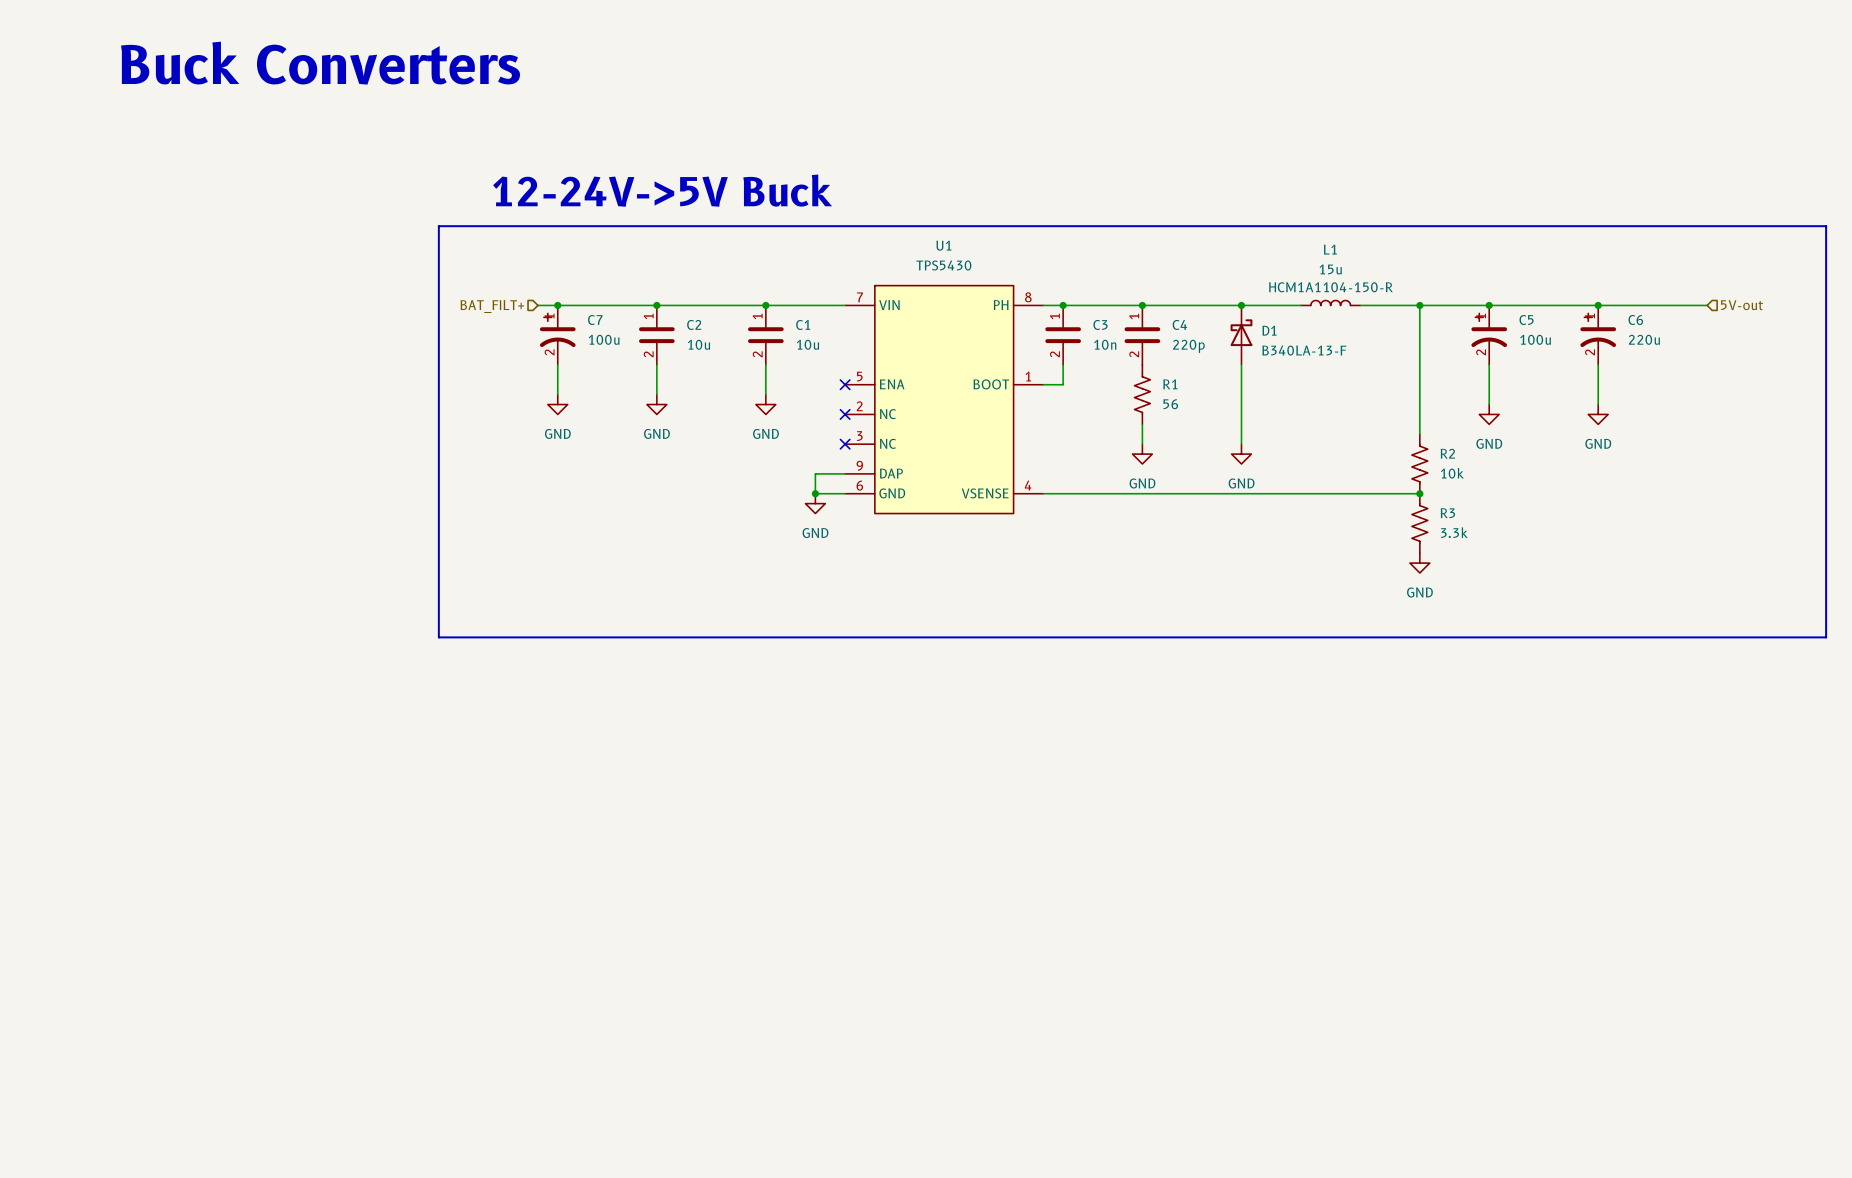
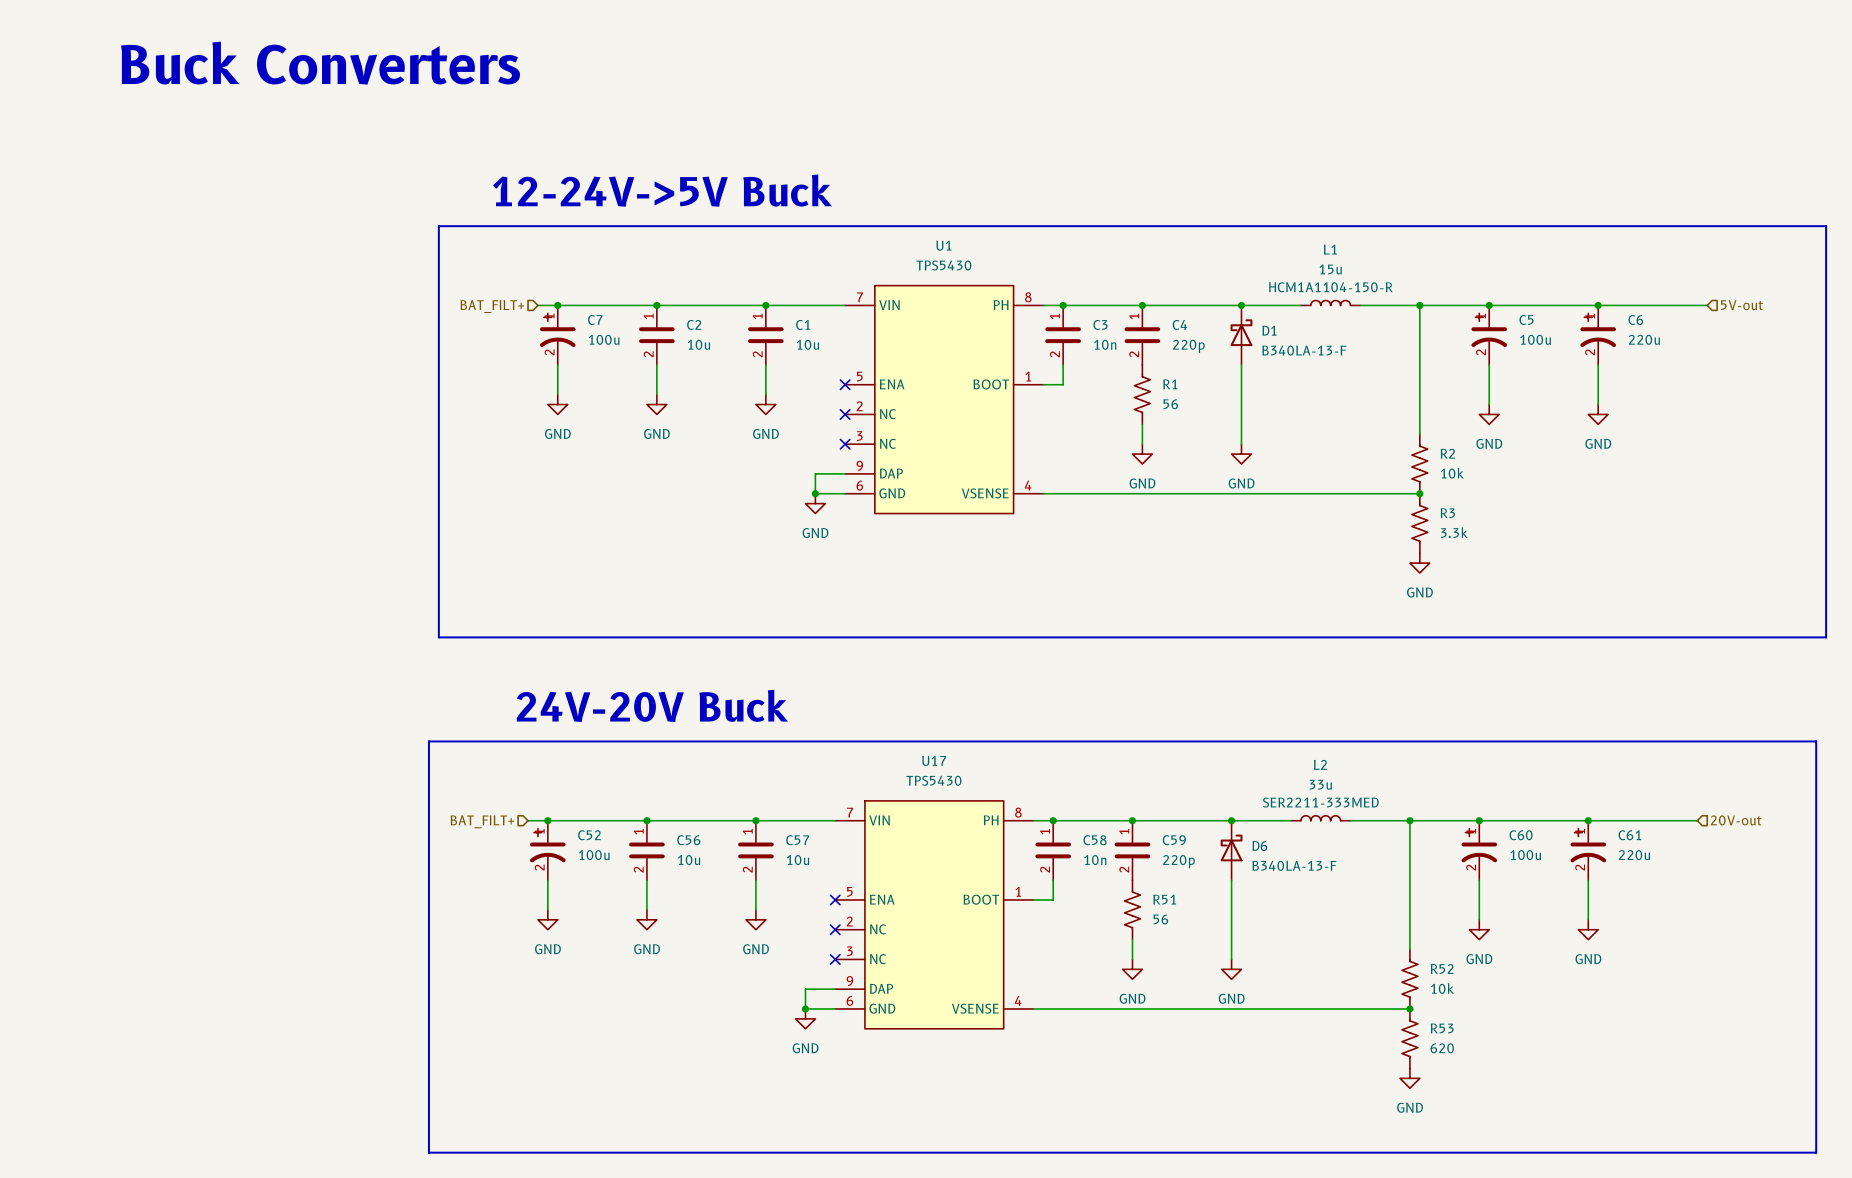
text: none -> 24V-20V Buck (652, 705)
line: none -> (428, 741) (1816, 741) (1816, 1152) (428, 1152) (428, 741)
L2: none -> 33u (1320, 818)
wire: none -> (528, 820) (835, 820)
junction: none -> (547, 820)
junction: none -> (646, 820)
junction: none -> (755, 820)
wire: none -> (1033, 820) (1291, 820)
junction: none -> (1053, 820)
junction: none -> (1132, 820)
junction: none -> (1231, 820)
wire: none -> (1350, 820) (1697, 820)
wire: none -> (1409, 820) (1409, 949)
junction: none -> (1409, 820)
junction: none -> (1479, 820)
junction: none -> (1588, 820)
hierarchical label: none -> 20V-out (1736, 820)
hierarchical label: none -> BAT_FILT+ (482, 821)
C52: none -> 100u (547, 850)
C56: none -> 10u (646, 850)
C57: none -> 10u (755, 850)
C58: none -> 10n (1053, 850)
C59: none -> 220p (1132, 850)
D6: none -> B340LA-13-F (1231, 850)
C60: none -> 100u (1479, 850)
C61: none -> 220u (1588, 850)
wire: none -> (547, 880) (547, 909)
wire: none -> (646, 880) (646, 909)
wire: none -> (755, 880) (755, 909)
wire: none -> (1053, 880) (1053, 899) (1033, 899)
wire: none -> (1231, 880) (1231, 959)
wire: none -> (1479, 880) (1479, 919)
wire: none -> (1588, 880) (1588, 919)
no-connect mark: none -> (835, 899)
R51: none -> 56 (1132, 909)
U17: none -> TPS5430 (934, 914)
power symbol: none -> GND (547, 919)
power symbol: none -> GND (646, 919)
power symbol: none -> GND (755, 919)
no-connect mark: none -> (835, 929)
power symbol: none -> GND (1479, 929)
power symbol: none -> GND (1588, 929)
wire: none -> (1132, 939) (1132, 959)
no-connect mark: none -> (835, 959)
power symbol: none -> GND (1132, 969)
power symbol: none -> GND (1231, 969)
R52: none -> 10k (1409, 979)
wire: none -> (835, 989) (805, 989) (805, 1008) (835, 1008)
junction: none -> (805, 1008)
wire: none -> (1033, 1008) (1409, 1008)
junction: none -> (1409, 1008)
power symbol: none -> GND (805, 1018)
R53: none -> 620 (1409, 1038)
power symbol: none -> GND (1409, 1078)

